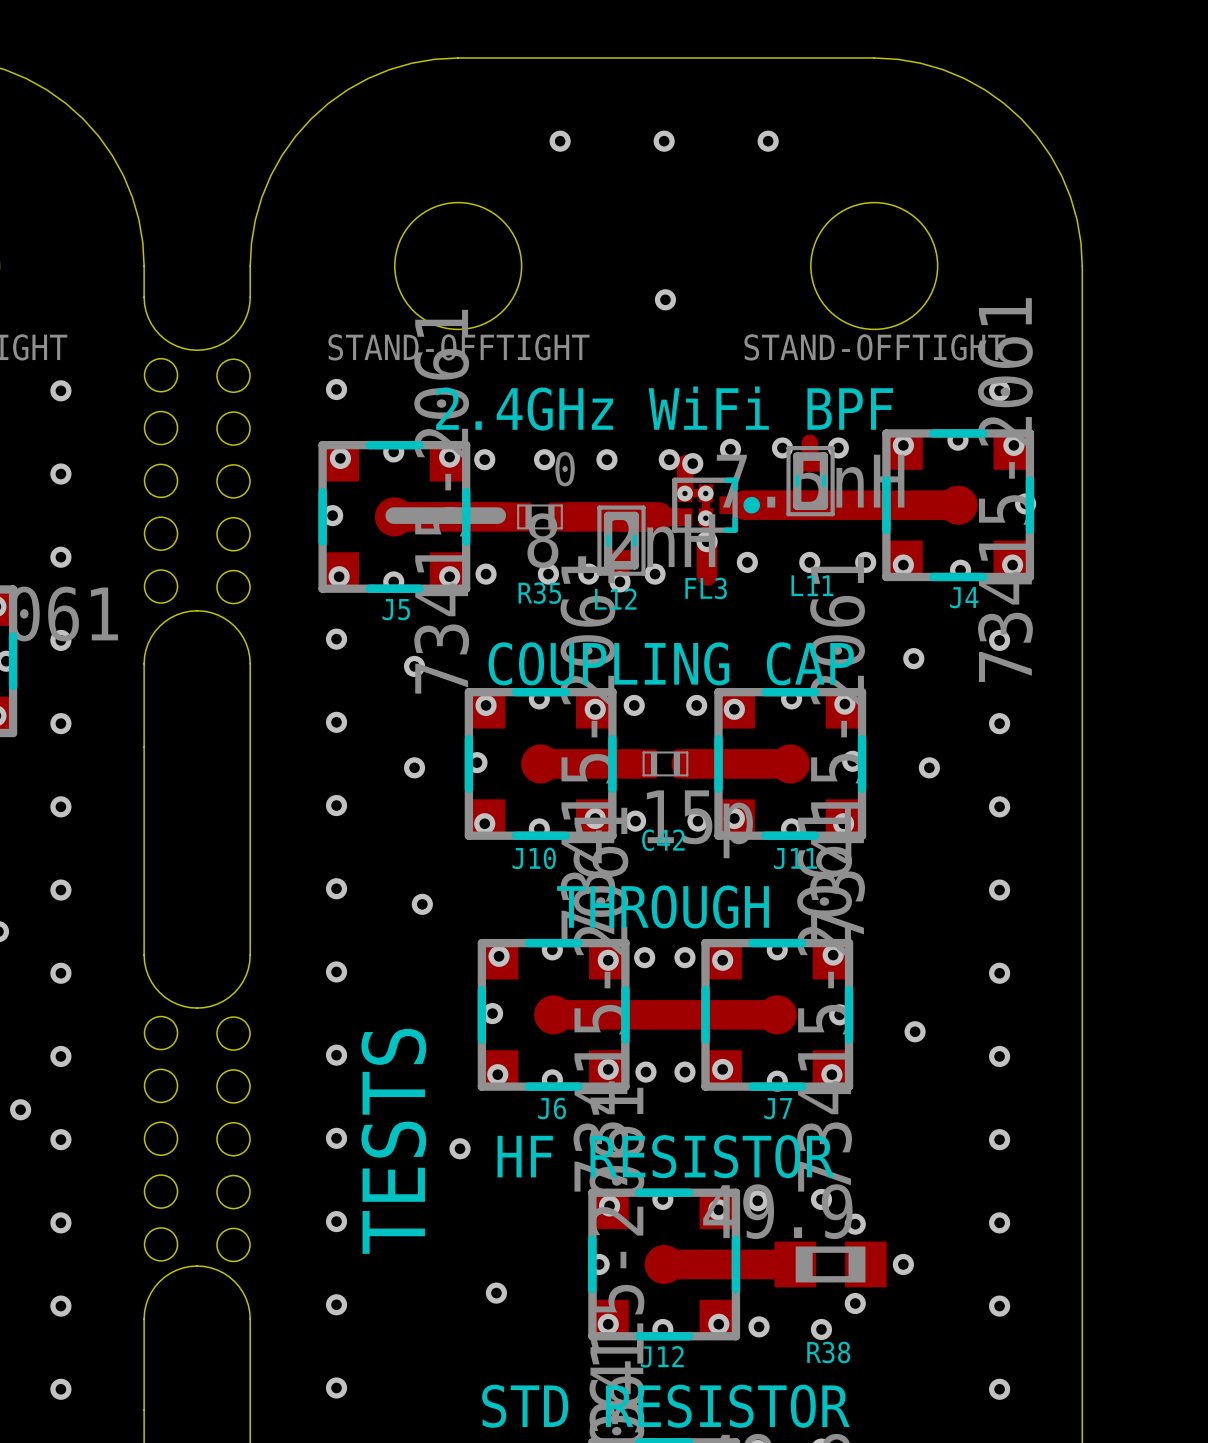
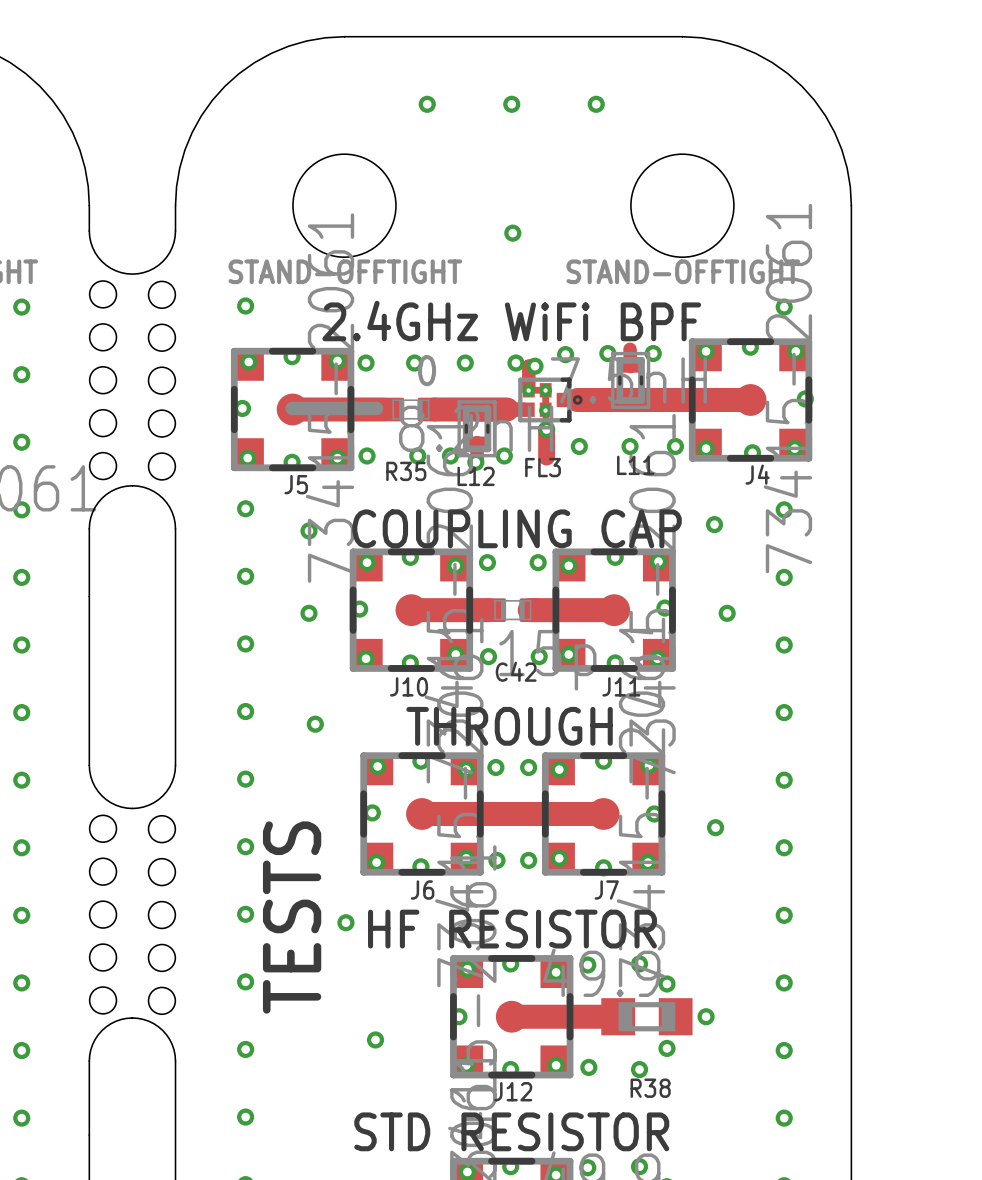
FL3 footprint: [672, 477, 761, 533] -> [518, 377, 583, 423]

